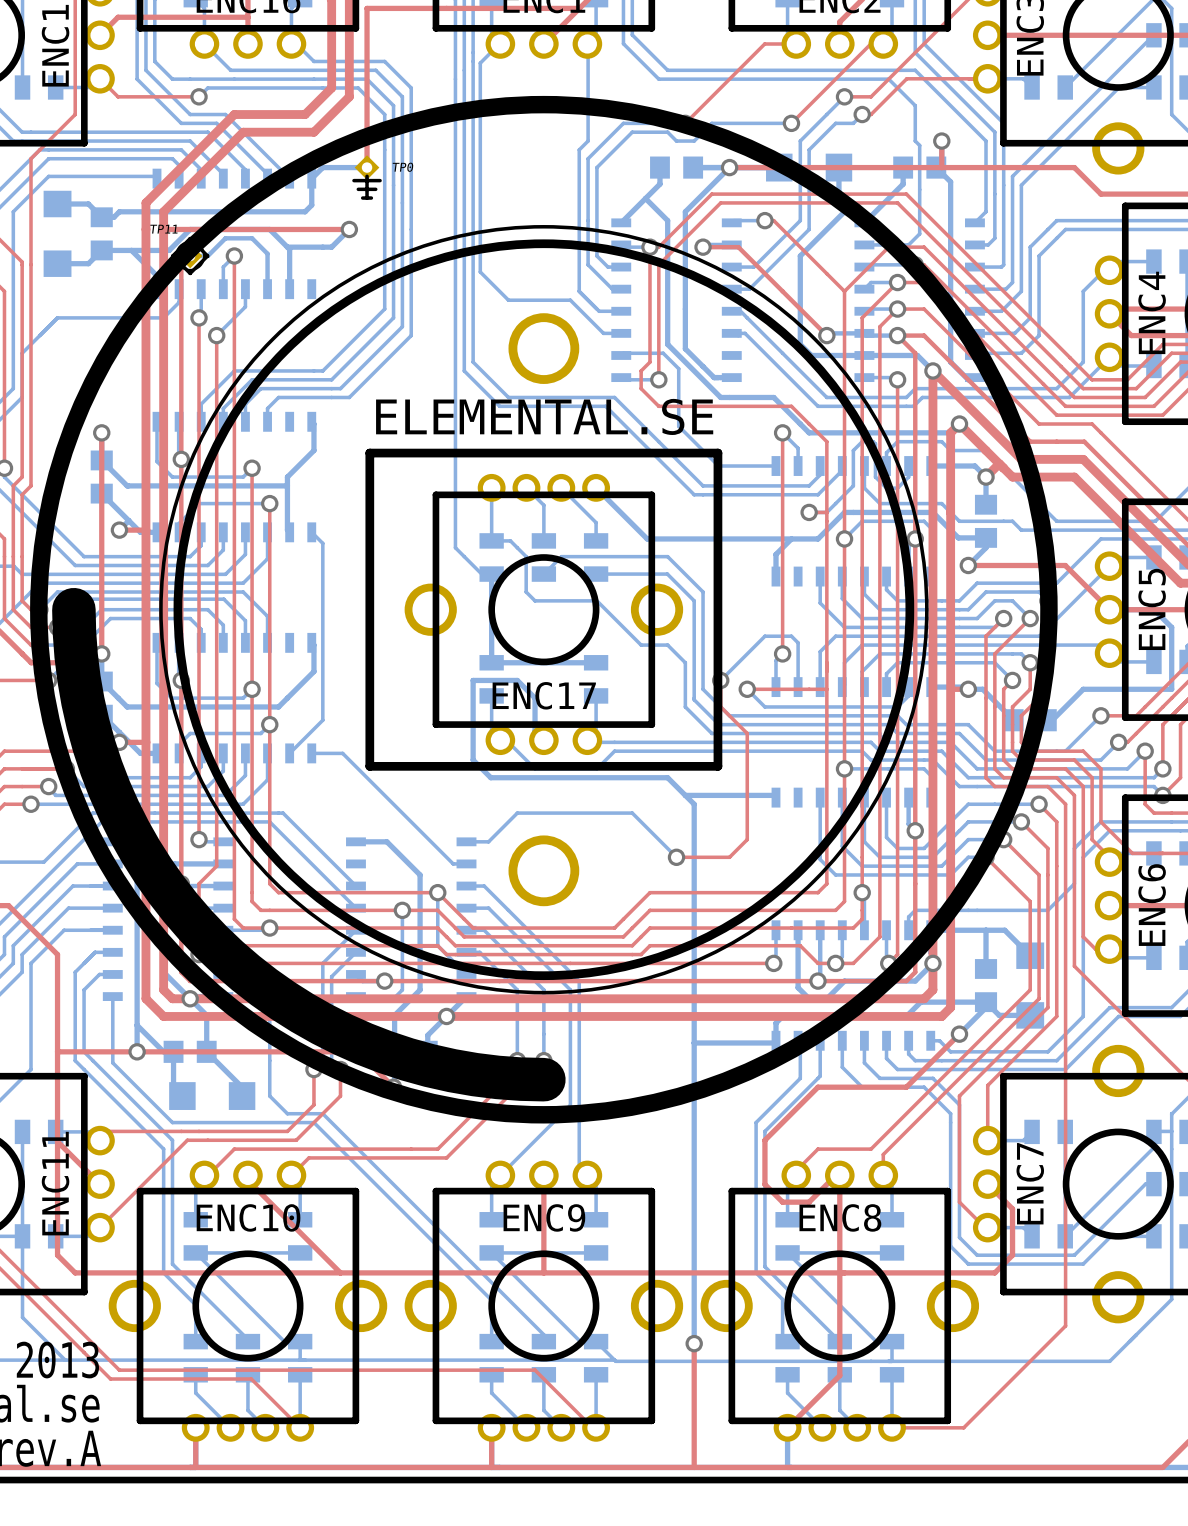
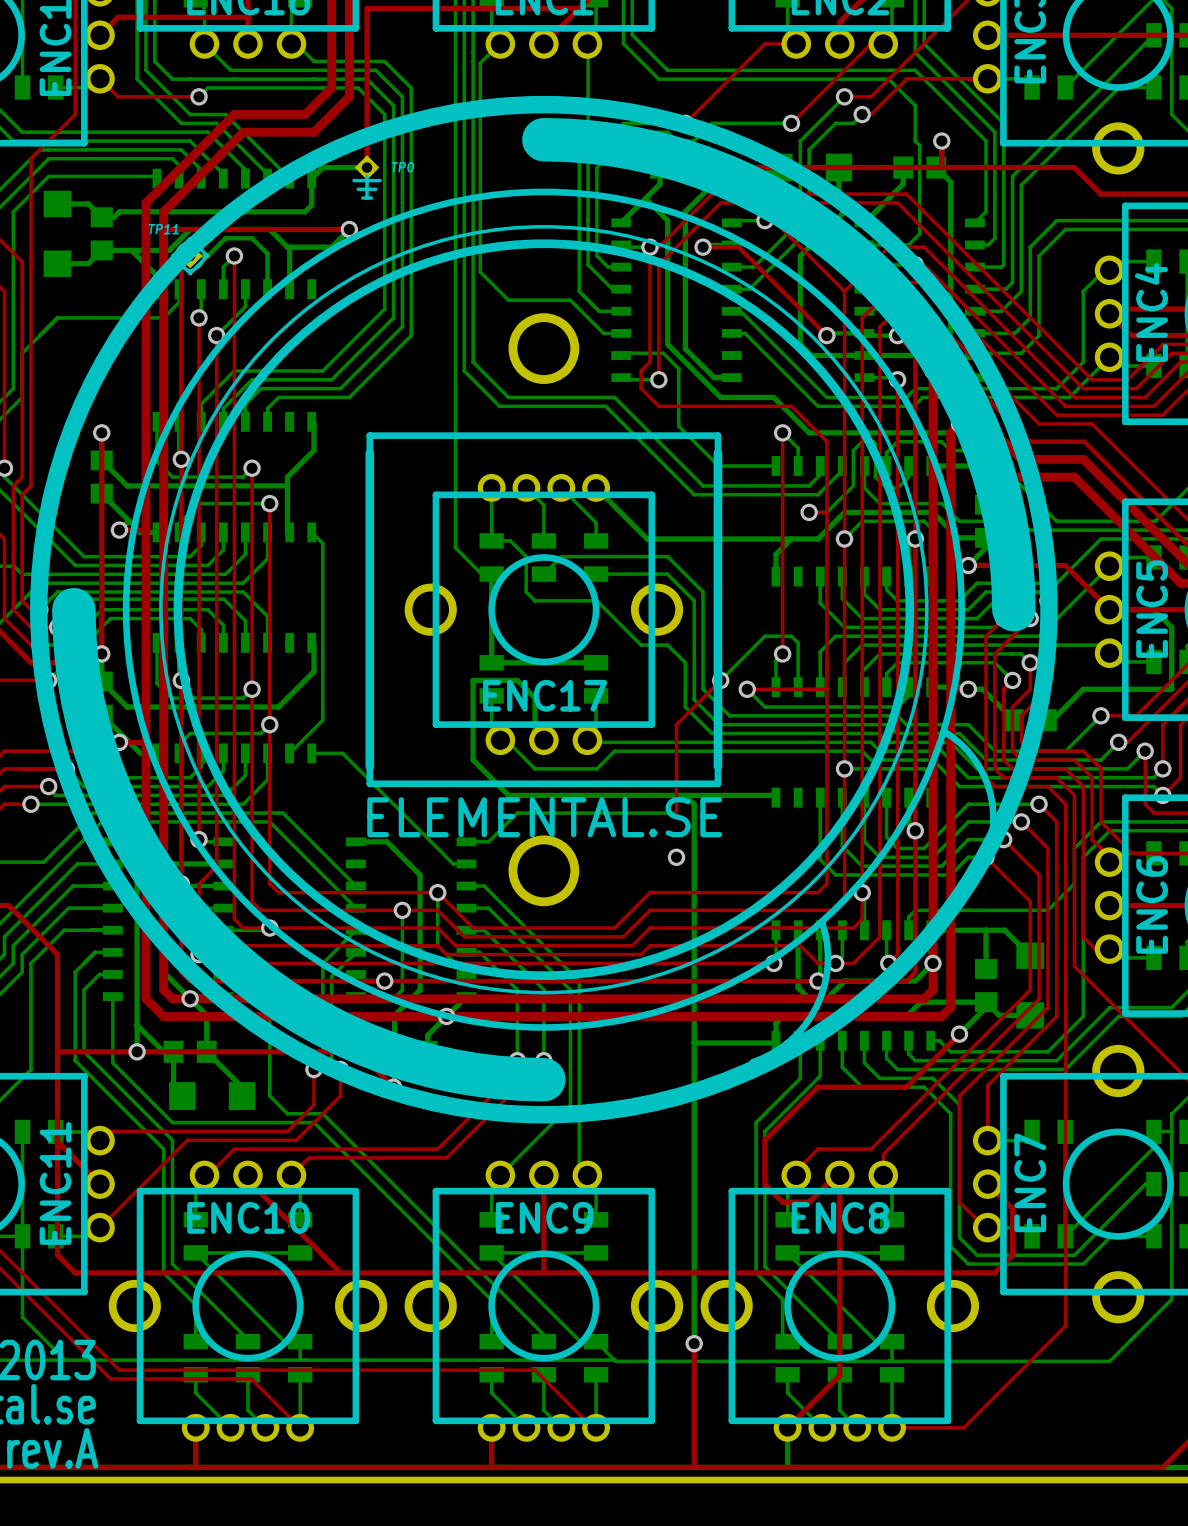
line: none -> (543, 139) (589, 141) (635, 148) (680, 159) (723, 175) (765, 195) (804, 218) (842, 246) (876, 277) (907, 311) (934, 348) (958, 388) (978, 429) (993, 473) (1004, 518) (1011, 563) (1013, 609)
drawing: none -> [122, 188, 965, 1031]
text position: ELEMENTAL.SE (544, 416) -> ELEMENTAL.SE (544, 817)
line: (369, 453) (717, 453) -> (369, 453) (369, 435) (717, 435) (717, 453)
top track: (720, 680) (720, 706) (747, 733) (747, 839) (729, 857) (676, 857) -> (720, 680) (676, 724) (676, 813)
line: none -> (944, 731) (960, 743) (973, 758) (983, 775) (990, 793) (993, 813) (992, 833) (987, 852) (979, 870)
line: (369, 766) (717, 766) -> (369, 766) (369, 783) (717, 783) (717, 766)
bottom track: (490, 777) (667, 777) (685, 795) -> (490, 777) (508, 795) (685, 795)
bottom track: (632, 813) (676, 857) -> (632, 813) (676, 813)
line: none -> (822, 923) (827, 944) (827, 965) (824, 986) (816, 1007) (804, 1025) (790, 1041) (772, 1053) (752, 1062)

